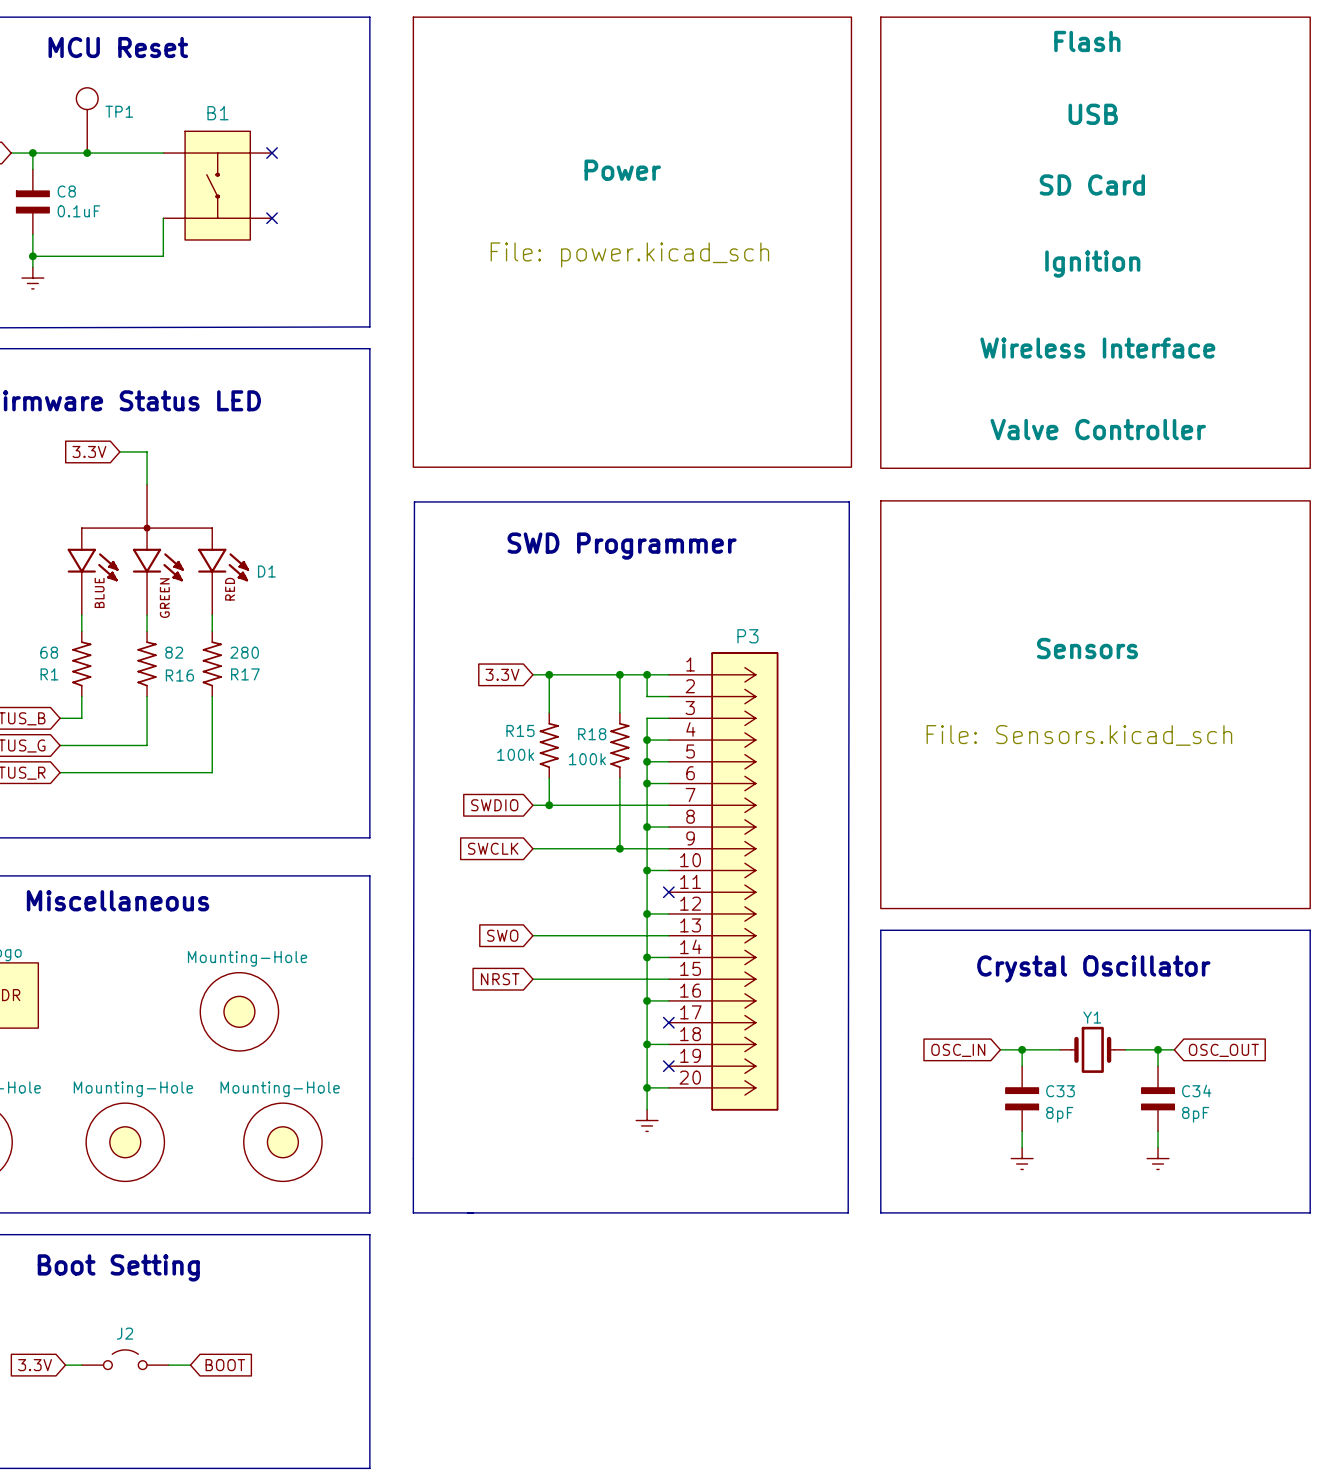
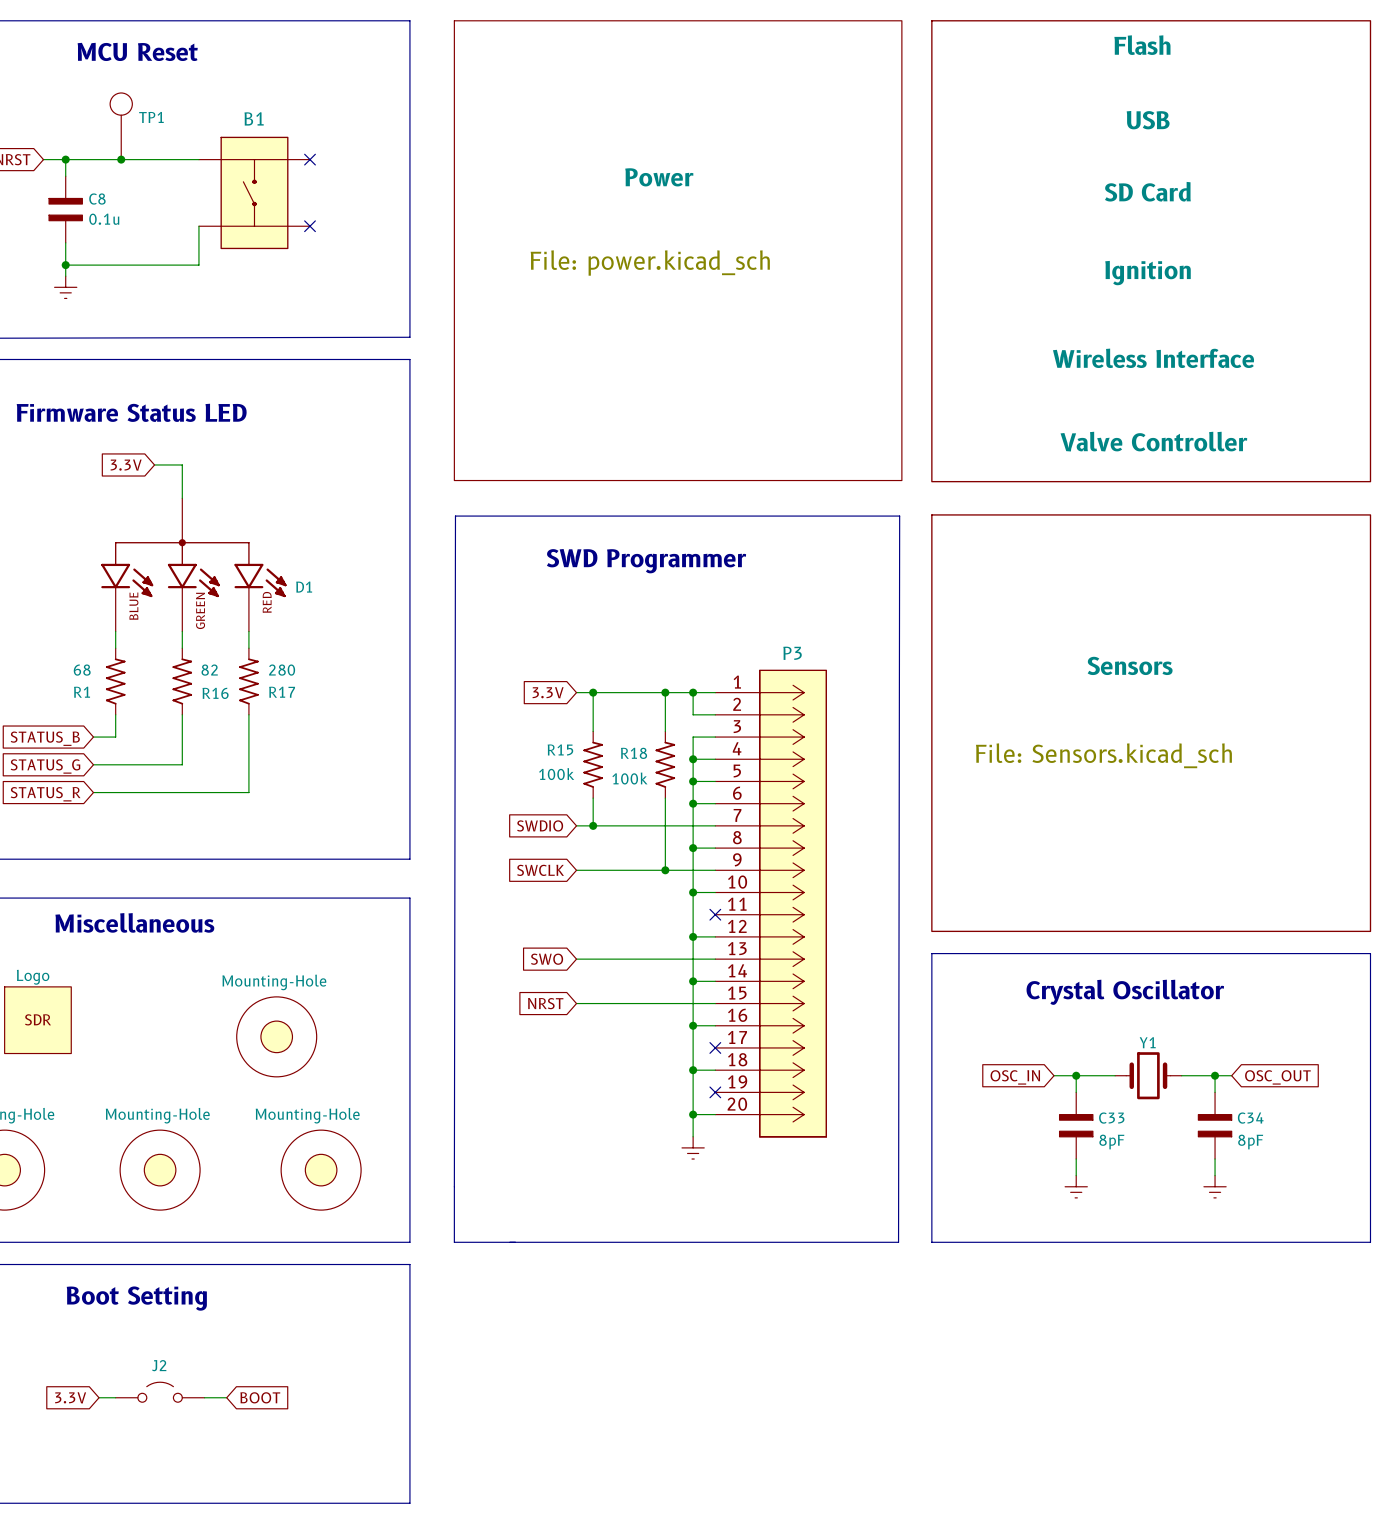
C8 value: 0.1uF (78, 211) -> 0.1u (104, 219)

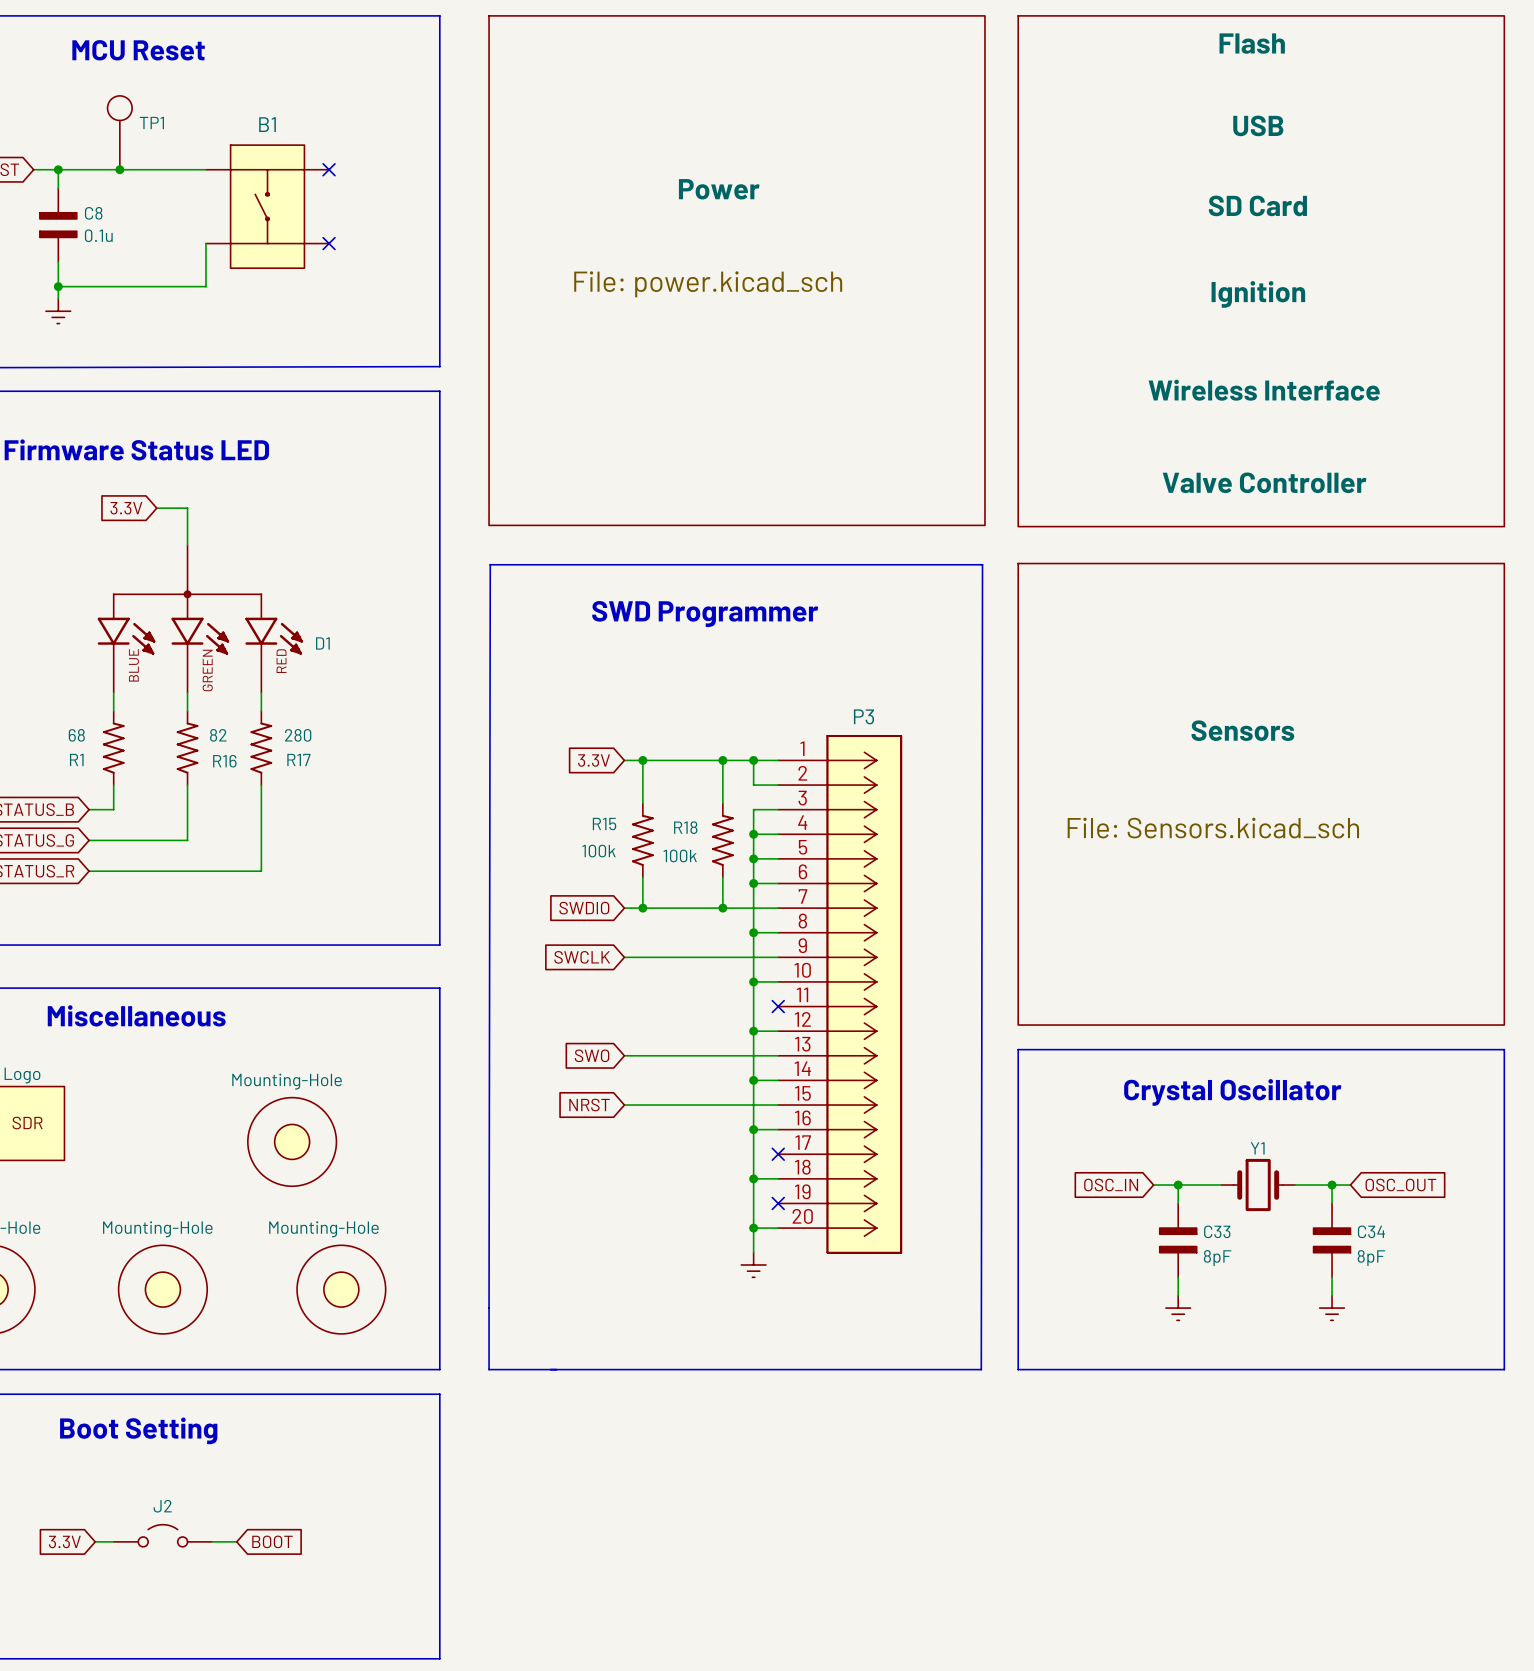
wire: (665, 825) (665, 870) -> none
junction position: (665, 870) -> (722, 908)

